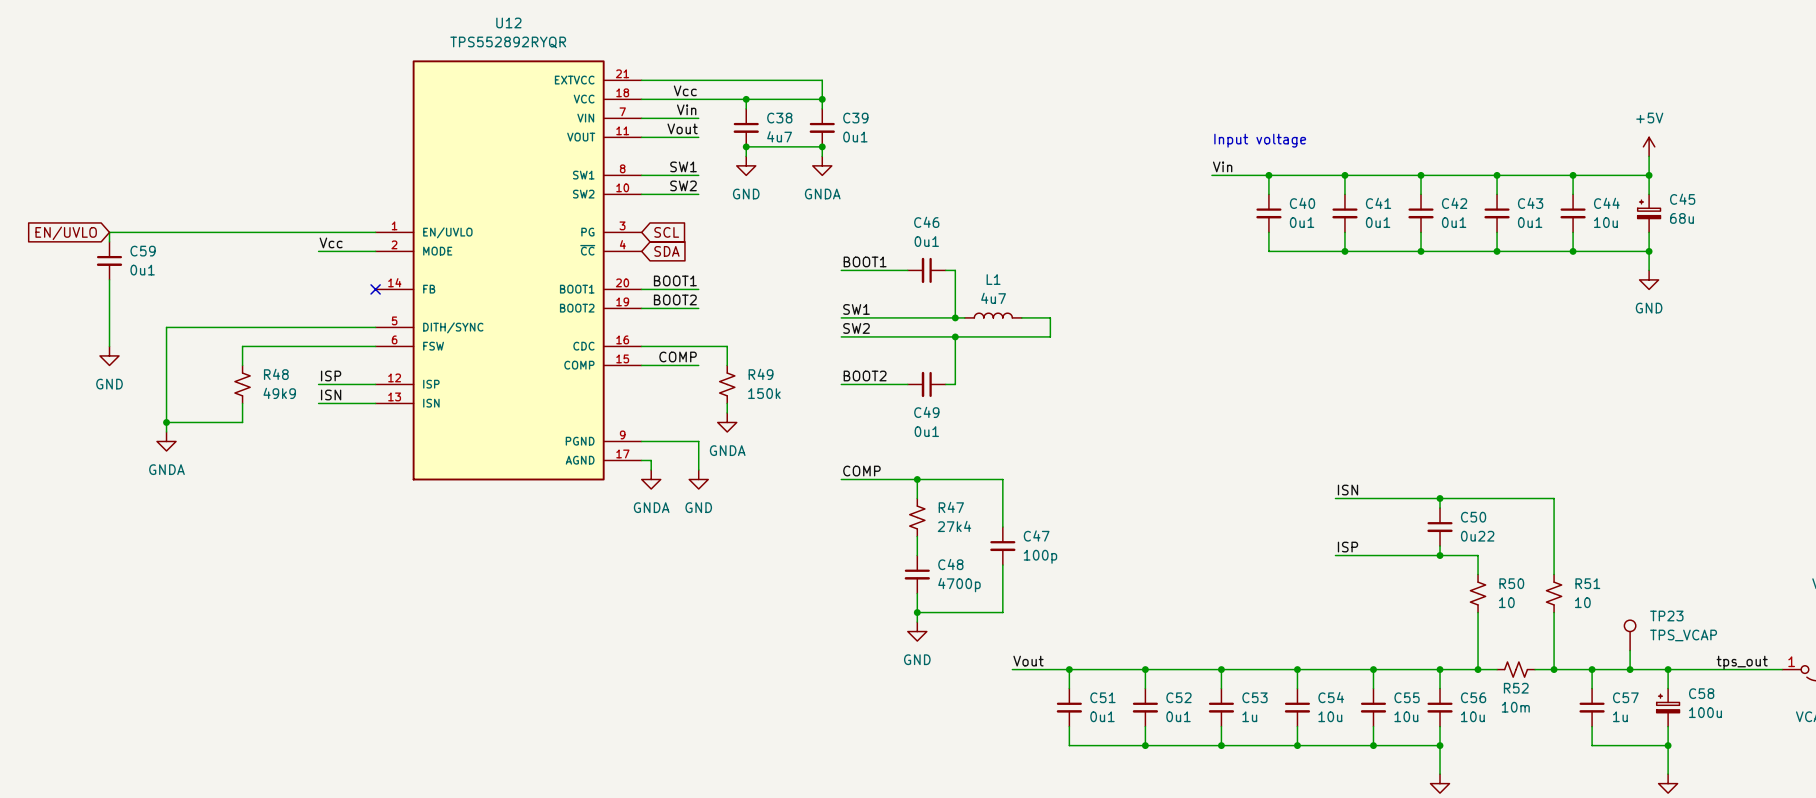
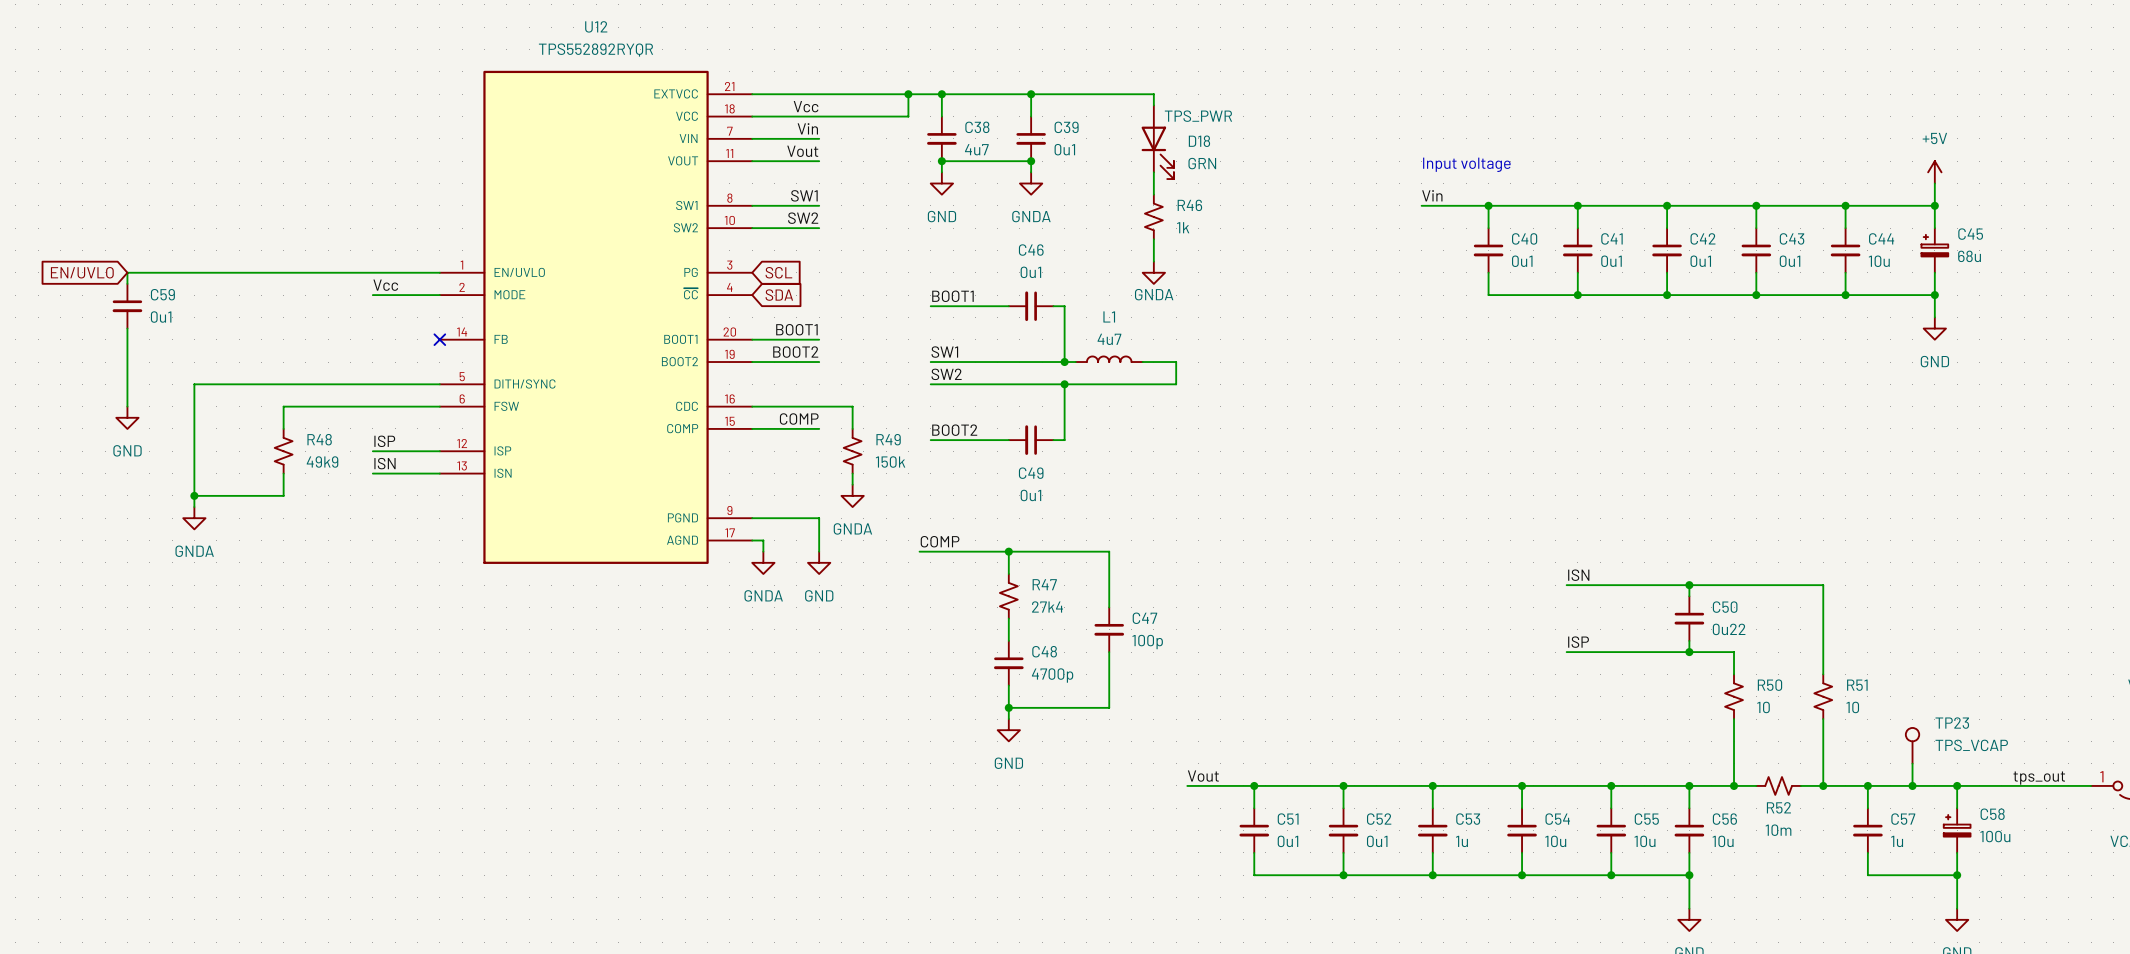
junction: none -> (908, 94)
wire: none -> (941, 94) (941, 116)
junction: none -> (941, 94)
wire: (822, 80) (822, 108) -> (964, 94) (1153, 94) (1153, 105)
wire: none -> (1031, 94) (1031, 116)
junction: none -> (1031, 94)
wire: (746, 99) (746, 108) -> none
junction: (746, 99) -> none
wire: (774, 99) (822, 99) -> (908, 116) (908, 94)
junction: (822, 99) -> none
D18: none -> GRN (1157, 142)
C38 position: (746, 127) -> (941, 138)
C39 position: (822, 127) -> (1031, 138)
junction: none -> (941, 161)
junction: none -> (1031, 161)
junction: (746, 146) -> none
junction: (822, 146) -> none
wire: none -> (1153, 172) (1153, 194)
wire: (746, 156) (746, 146) (822, 146) (822, 156) -> (941, 172) (941, 161) (1031, 161) (1031, 172)
power symbol position: GND (746, 165) -> GND (941, 183)
power symbol position: GNDA (822, 165) -> GNDA (1031, 183)
R46: none -> 1k (1153, 216)
wire: none -> (1153, 239) (1153, 261)
power symbol: none -> GNDA (1153, 272)
label position: BOOT1 (865, 261) -> BOOT1 (952, 296)
wire: (841, 270) (907, 270) -> (930, 306) (1008, 306)
C46 position: (926, 270) -> (1031, 306)
wire: (945, 270) (955, 270) (955, 317) -> (1053, 306) (1064, 306) (1064, 362)
junction: none -> (1064, 362)
label position: SW1 (856, 309) -> SW1 (944, 352)
L1 position: (993, 315) -> (1109, 359)
wire: (841, 317) (964, 317) -> (930, 362) (1075, 362)
junction: (955, 317) -> none
wire: (1021, 317) (1050, 317) (1050, 336) (841, 336) -> (1142, 362) (1176, 362) (1176, 384) (930, 384)
junction: none -> (1064, 384)
label position: SW2 (856, 328) -> SW2 (946, 374)
wire: (955, 336) (955, 384) (945, 384) -> (1064, 384) (1064, 440) (1053, 440)
junction: (955, 336) -> none
label position: BOOT2 (865, 375) -> BOOT2 (954, 430)
wire: (841, 384) (907, 384) -> (930, 440) (1008, 440)
C49 position: (926, 384) -> (1031, 440)
junction: none -> (1008, 551)
label position: COMP (861, 471) -> COMP (940, 541)
wire: (841, 479) (1002, 479) (1002, 527) -> (919, 551) (1109, 551) (1109, 607)
wire: (917, 479) (917, 498) -> (1008, 551) (1008, 573)
junction: (917, 479) -> none
R47 position: (917, 517) -> (1008, 596)
wire: (917, 536) (917, 555) -> (1008, 618) (1008, 640)
C47 position: (1002, 546) -> (1109, 629)
wire: (1002, 565) (1002, 612) (917, 612) -> (1109, 652) (1109, 707) (1008, 707)
C48 position: (917, 574) -> (1008, 663)
wire: (917, 593) (917, 622) -> (1008, 685) (1008, 719)
junction: none -> (1008, 707)
junction: (917, 612) -> none
power symbol position: GND (917, 631) -> GND (1008, 730)

